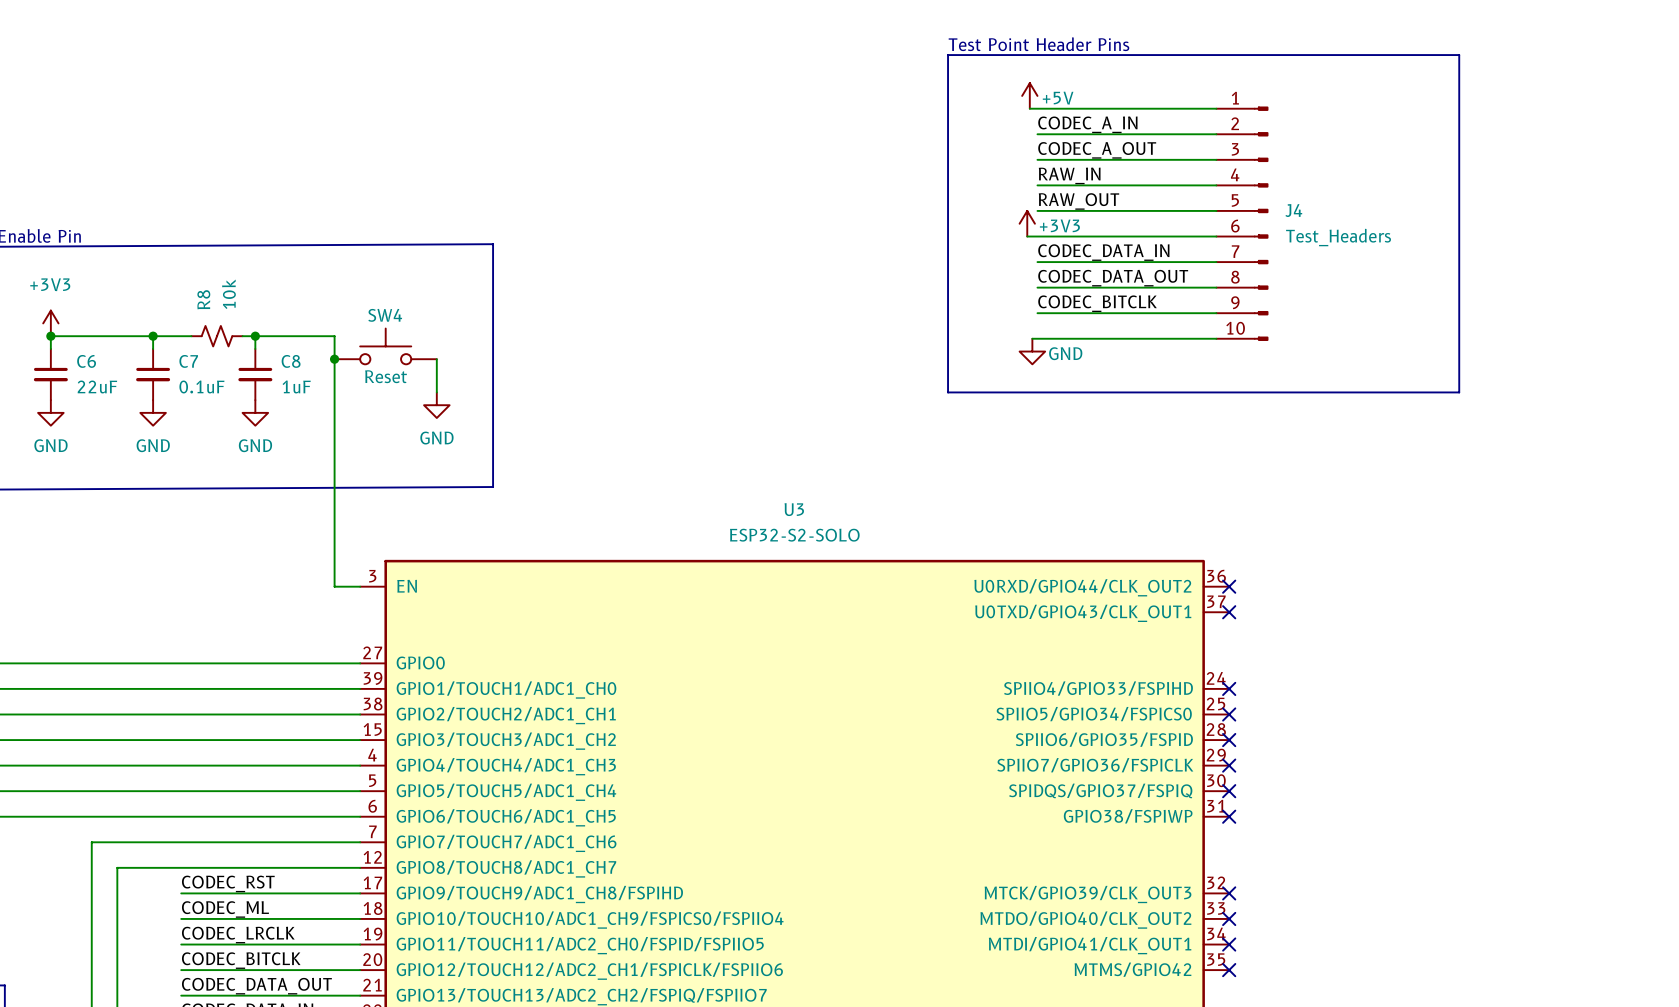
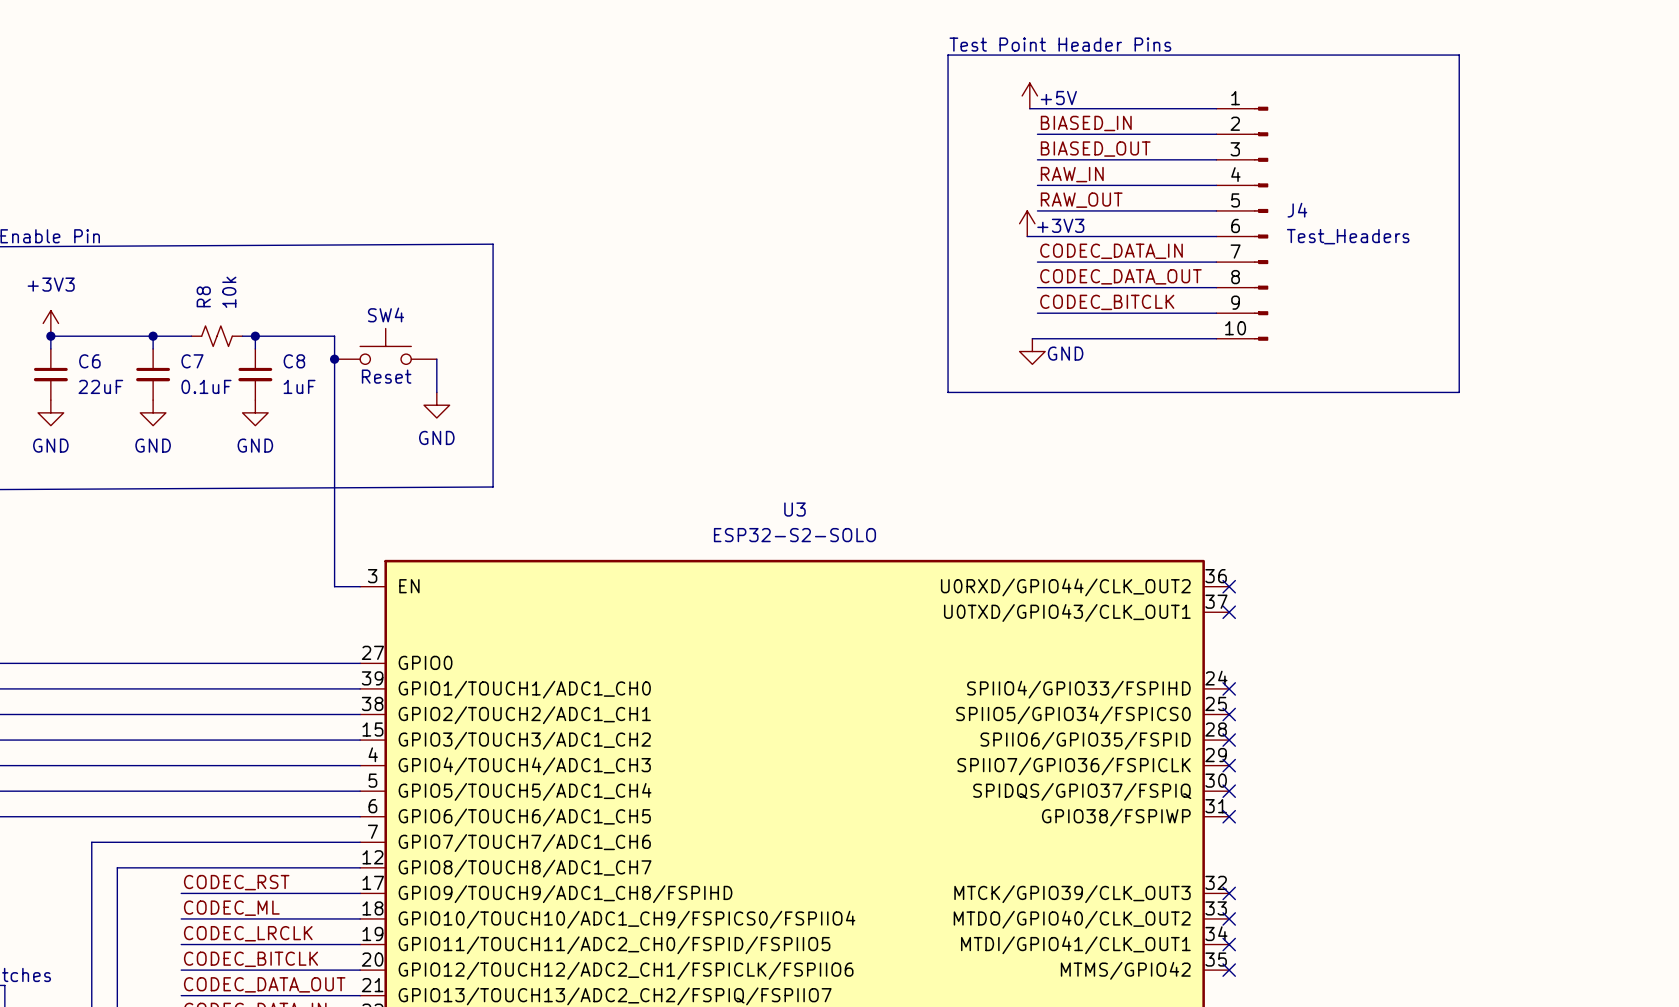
label: CODEC_A_IN (1087, 124) -> BIASED_IN (1086, 123)
label: CODEC_A_OUT (1097, 150) -> BIASED_OUT (1095, 149)

